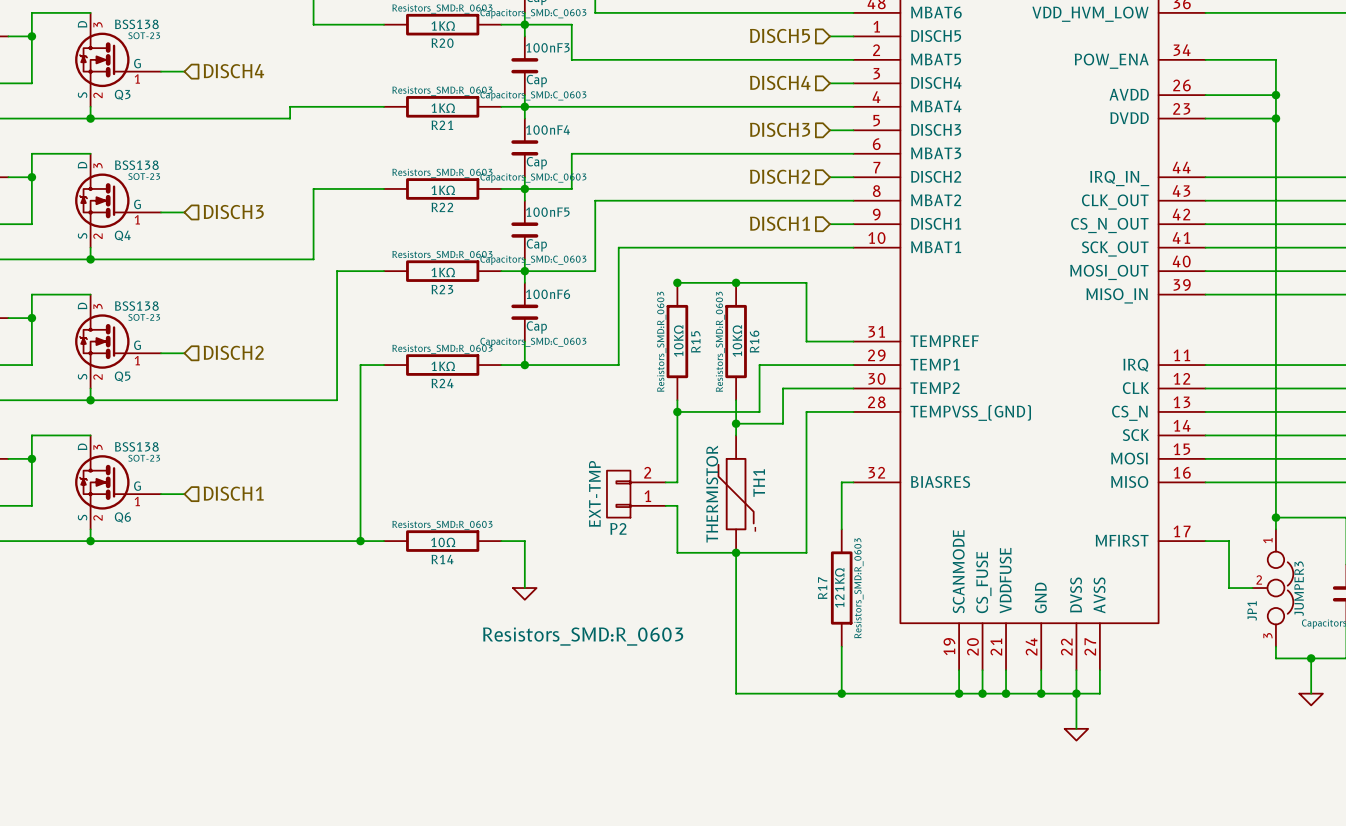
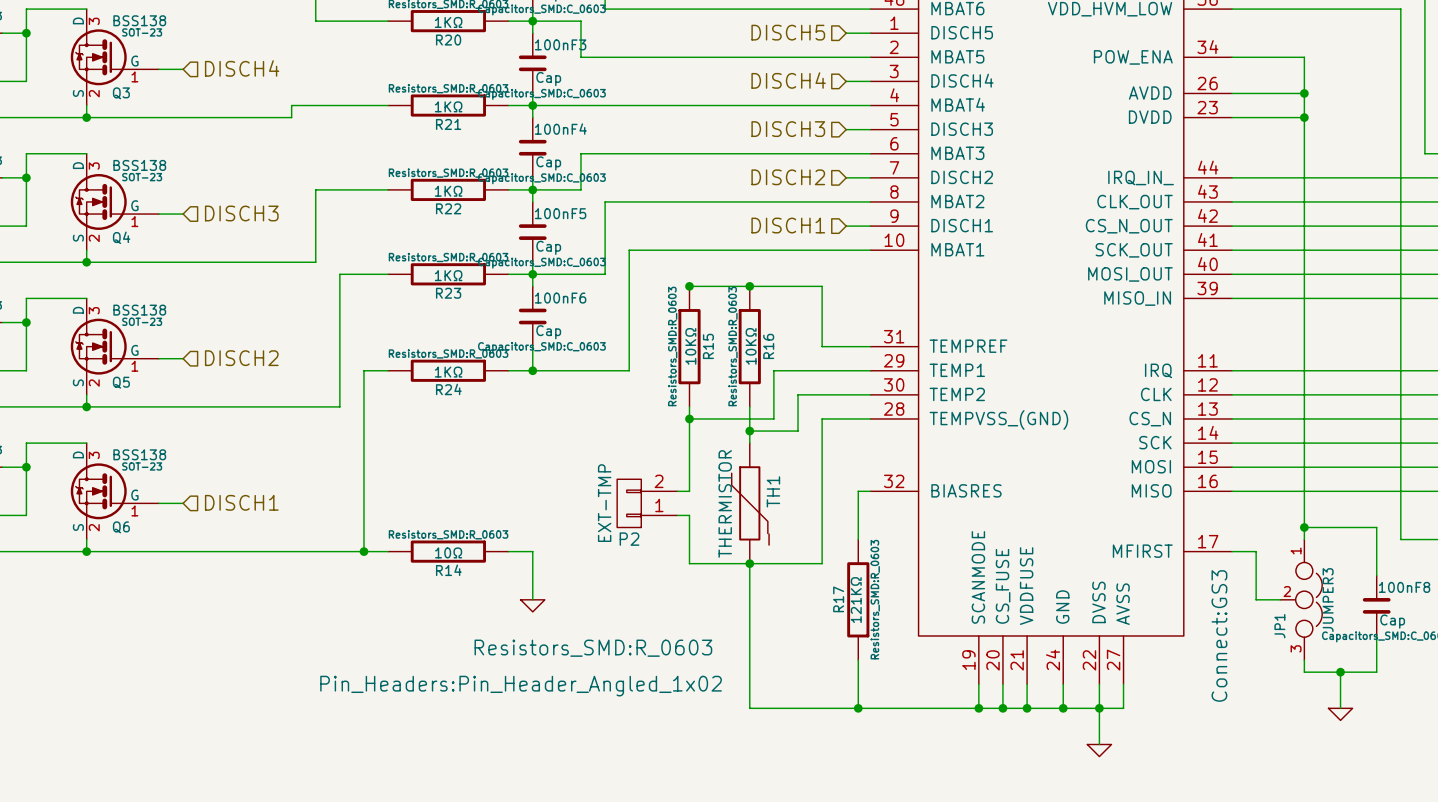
JP1 text: none -> Connect:GS3 (1219, 635)
P2 text: none -> Pin_Headers:Pin_Header_Angled_1x02 (521, 686)

